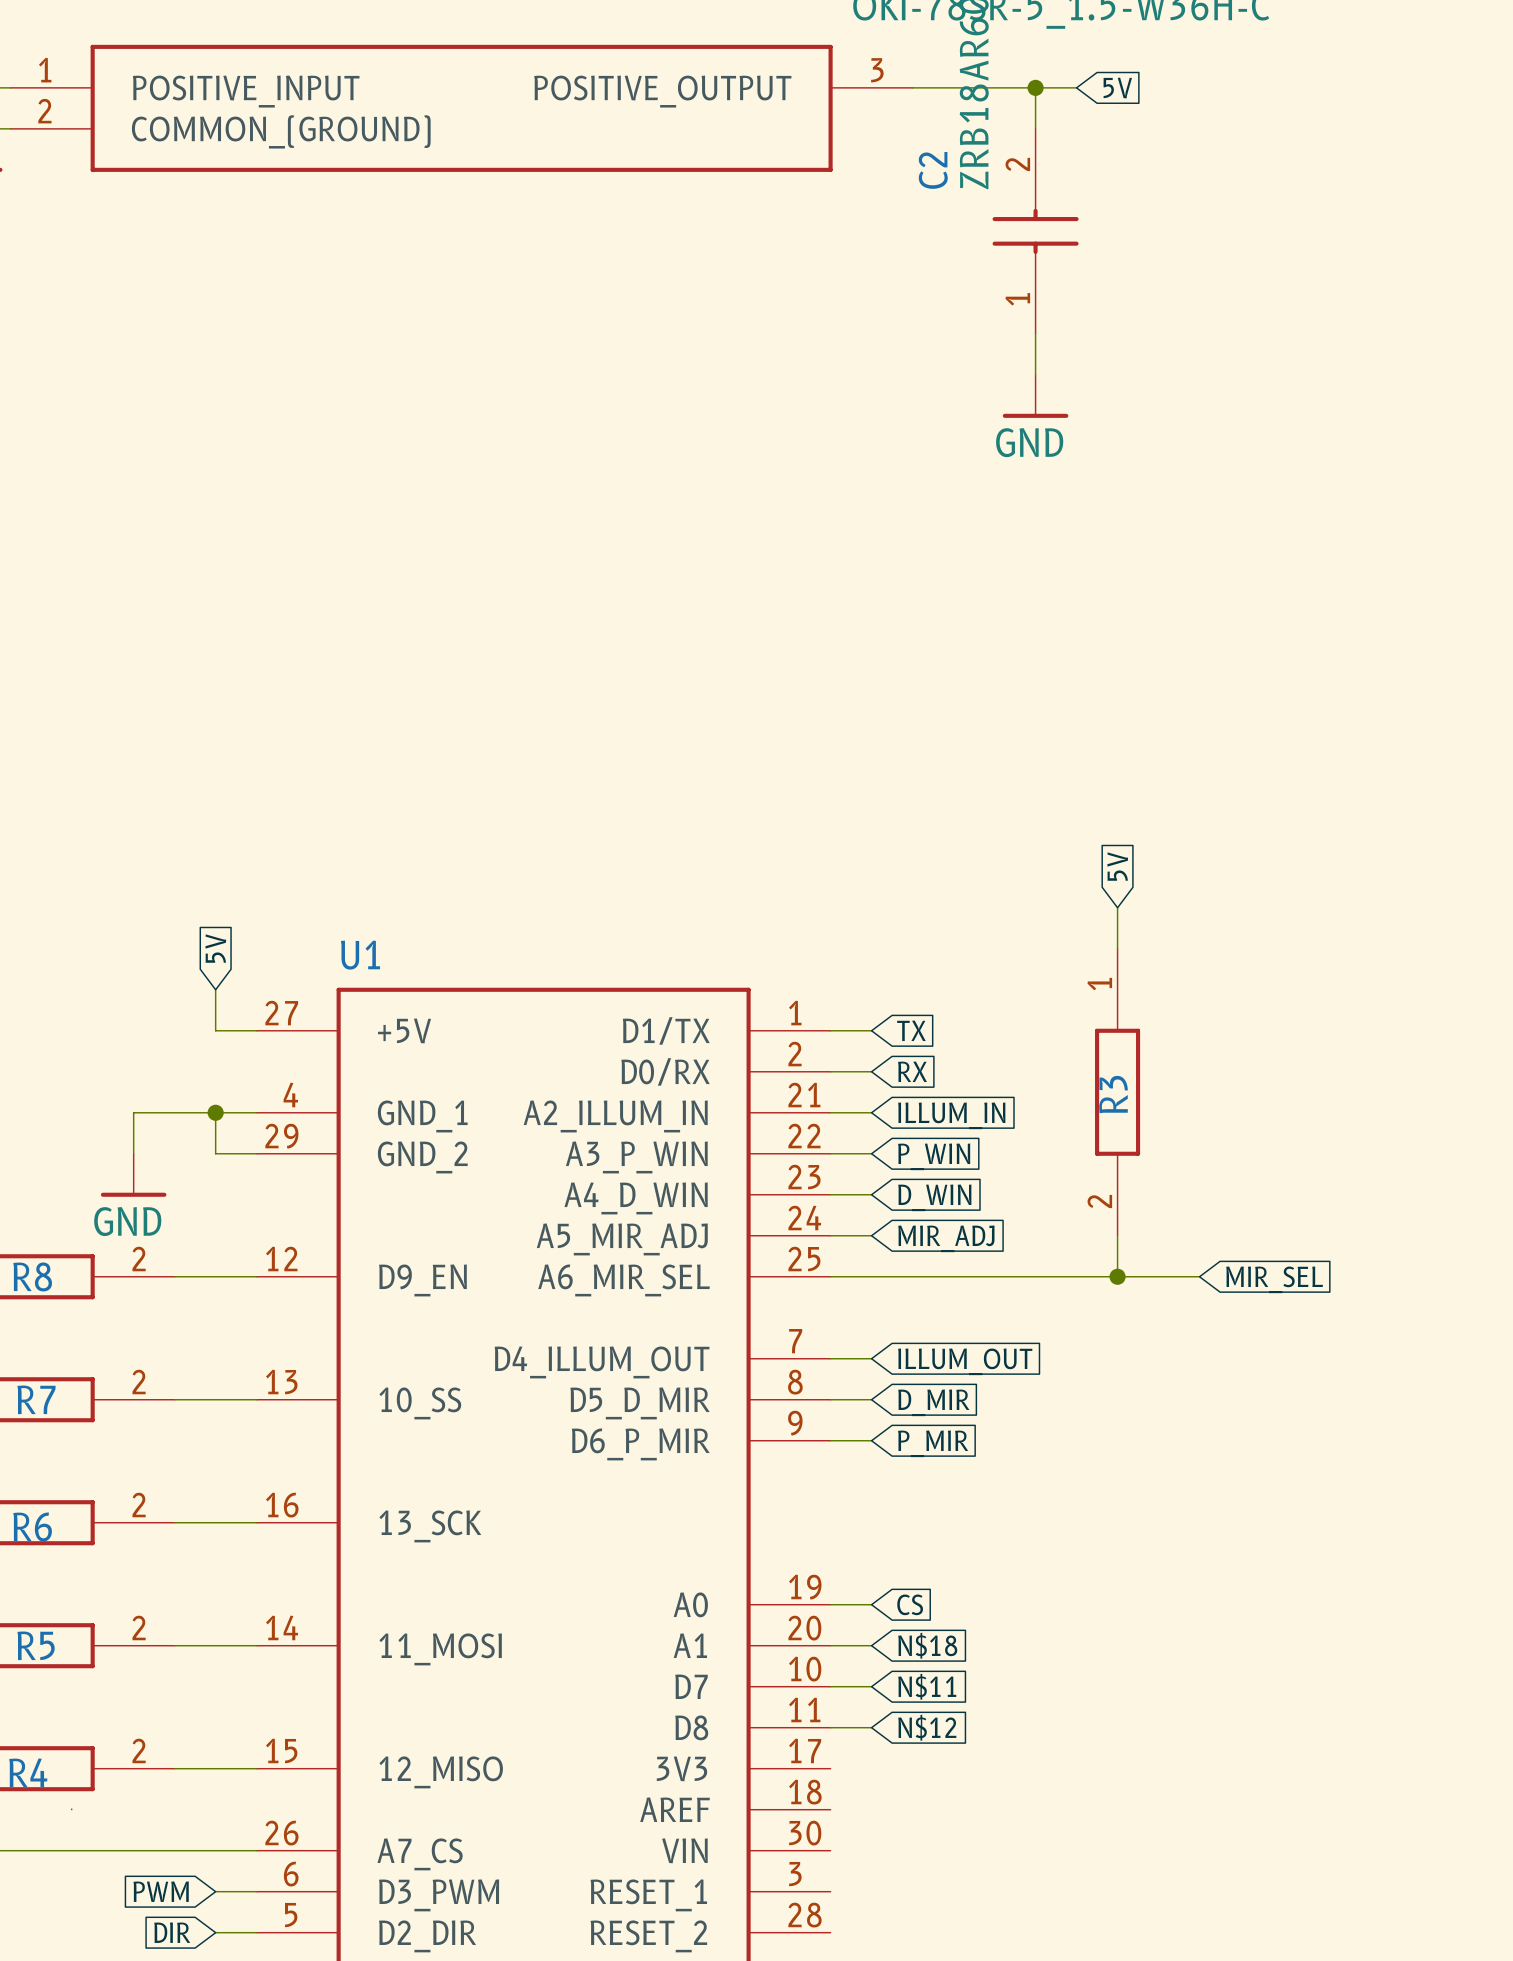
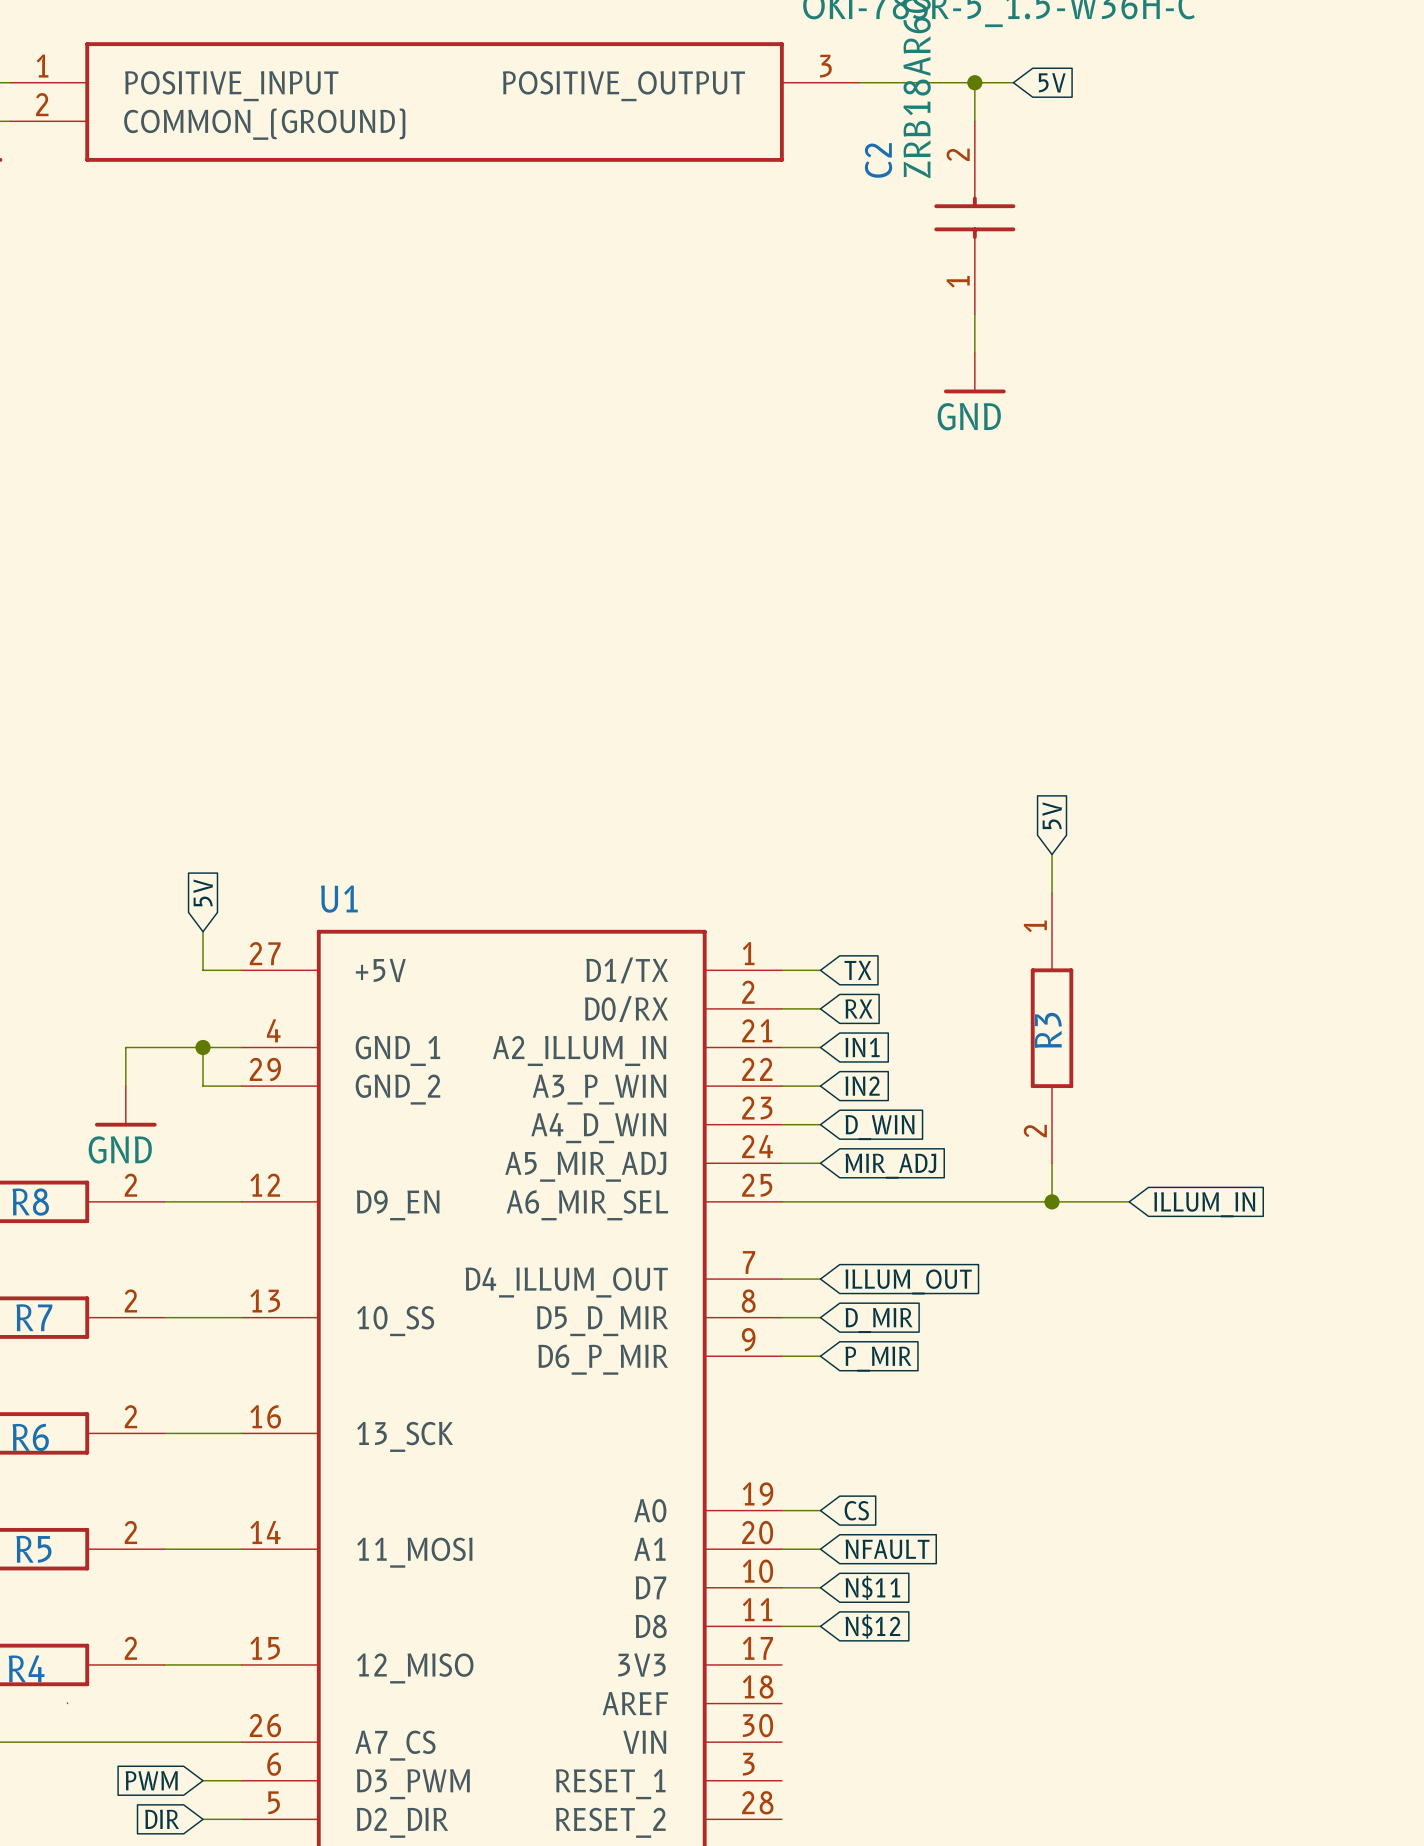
global label: ILLUM_IN (951, 1115) -> IN1 (862, 1047)
global label: P_WIN (934, 1156) -> IN2 (862, 1086)
global label: MIR_SEL (1274, 1279) -> ILLUM_IN (1204, 1204)
global label: N$18 (927, 1645) -> NFAULT (887, 1549)

